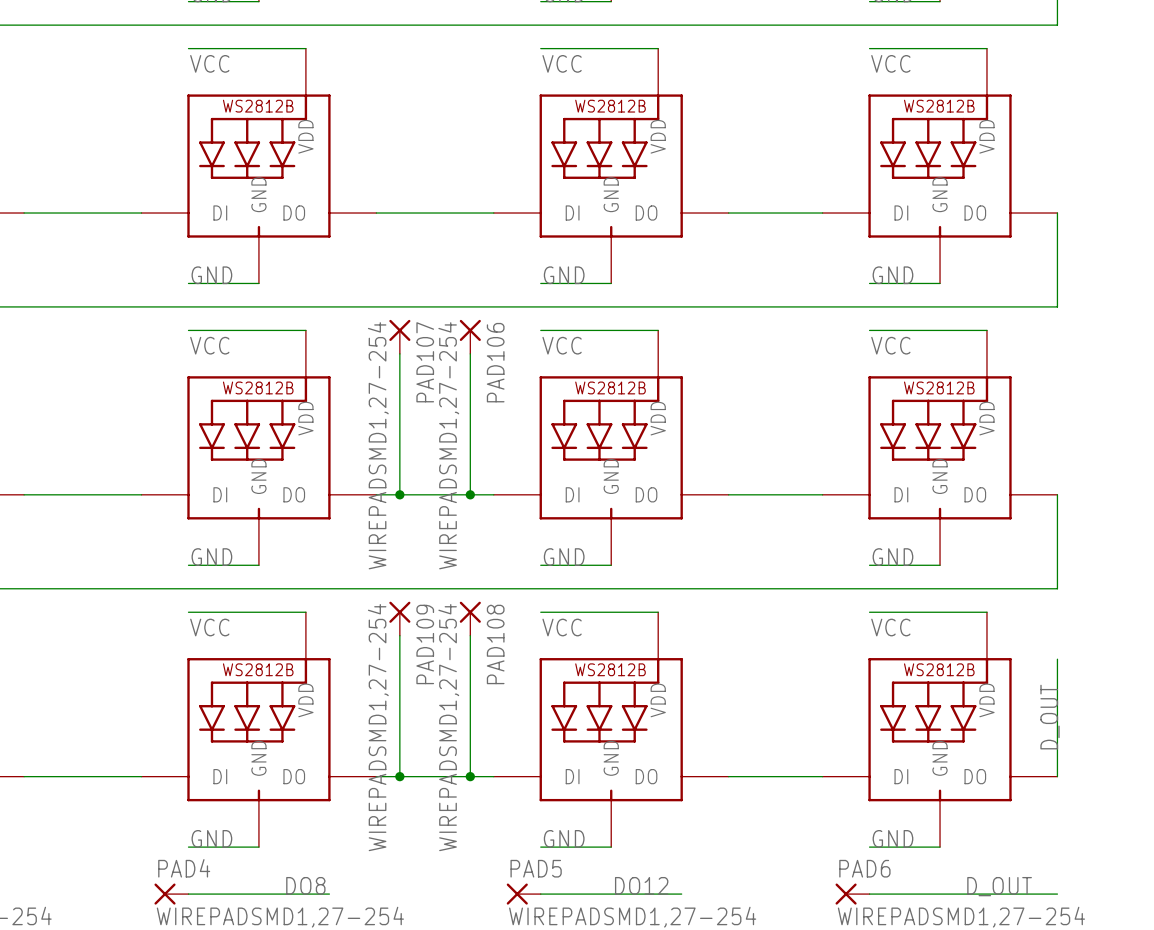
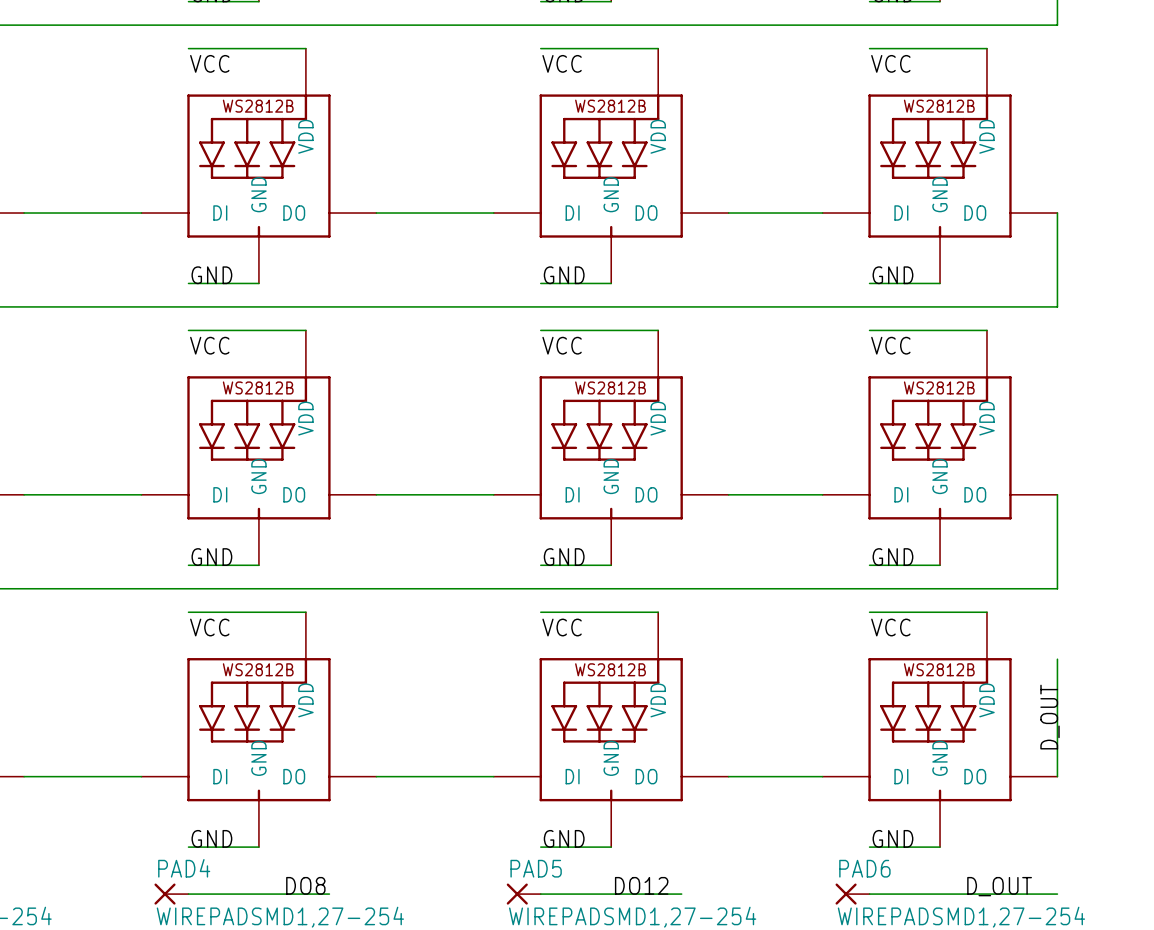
PAD107: WIREPADSMD1,27-254 (399, 336) -> none
PAD106: WIREPADSMD1,27-254 (470, 336) -> none
wire: (399, 353) (399, 494) -> none
wire: (470, 353) (470, 494) -> none
junction: (399, 494) -> none
junction: (470, 494) -> none
PAD109: WIREPADSMD1,27-254 (399, 618) -> none
PAD108: WIREPADSMD1,27-254 (470, 618) -> none
wire: (399, 635) (399, 776) -> none
wire: (470, 635) (470, 776) -> none
junction: (399, 776) -> none
junction: (470, 776) -> none

